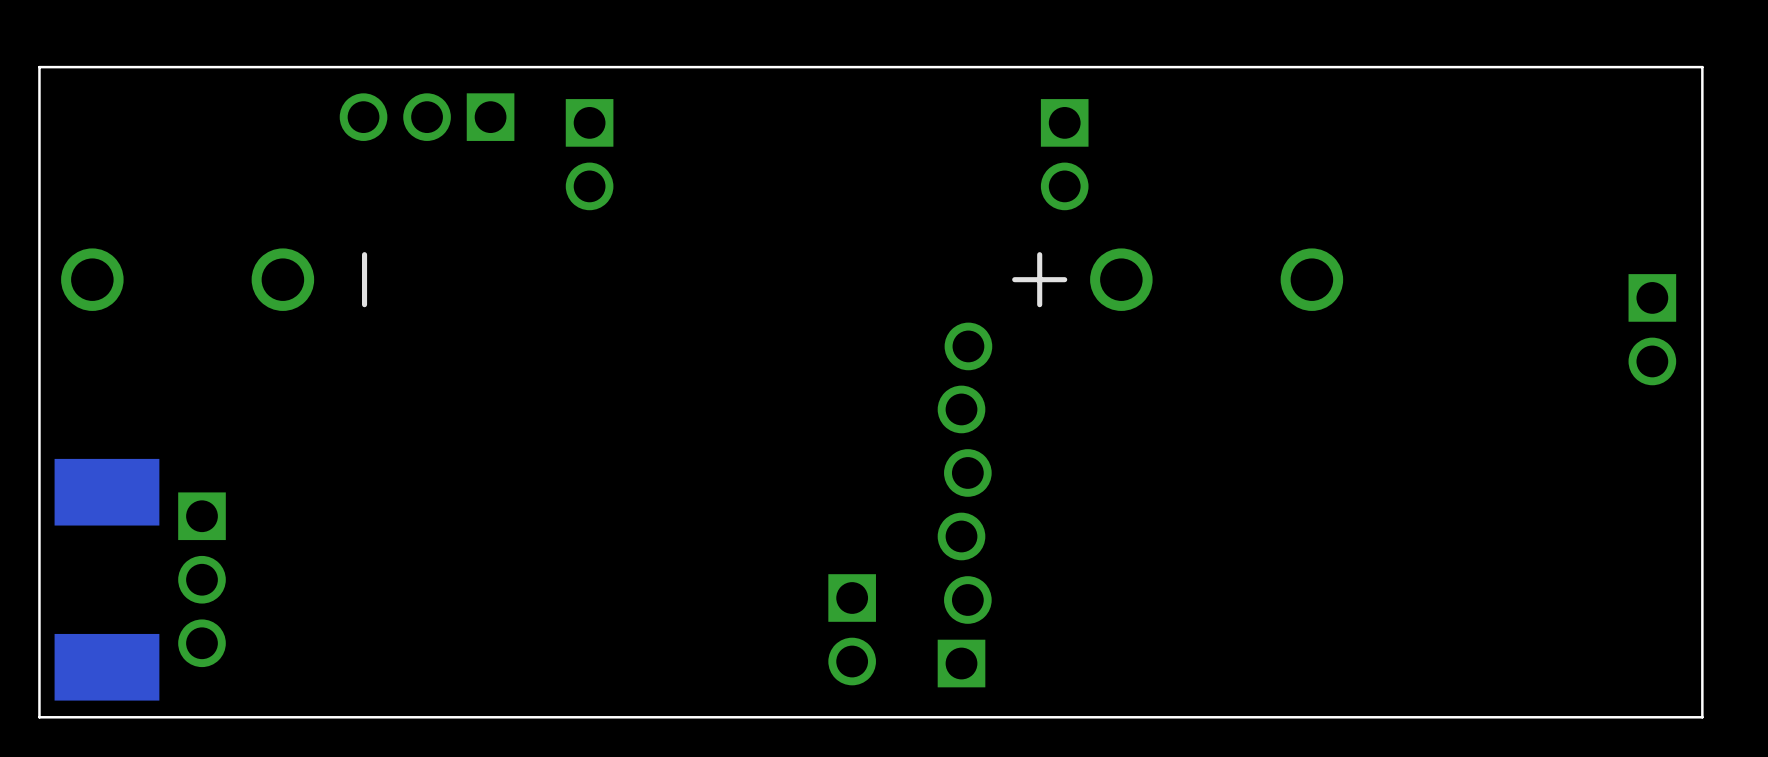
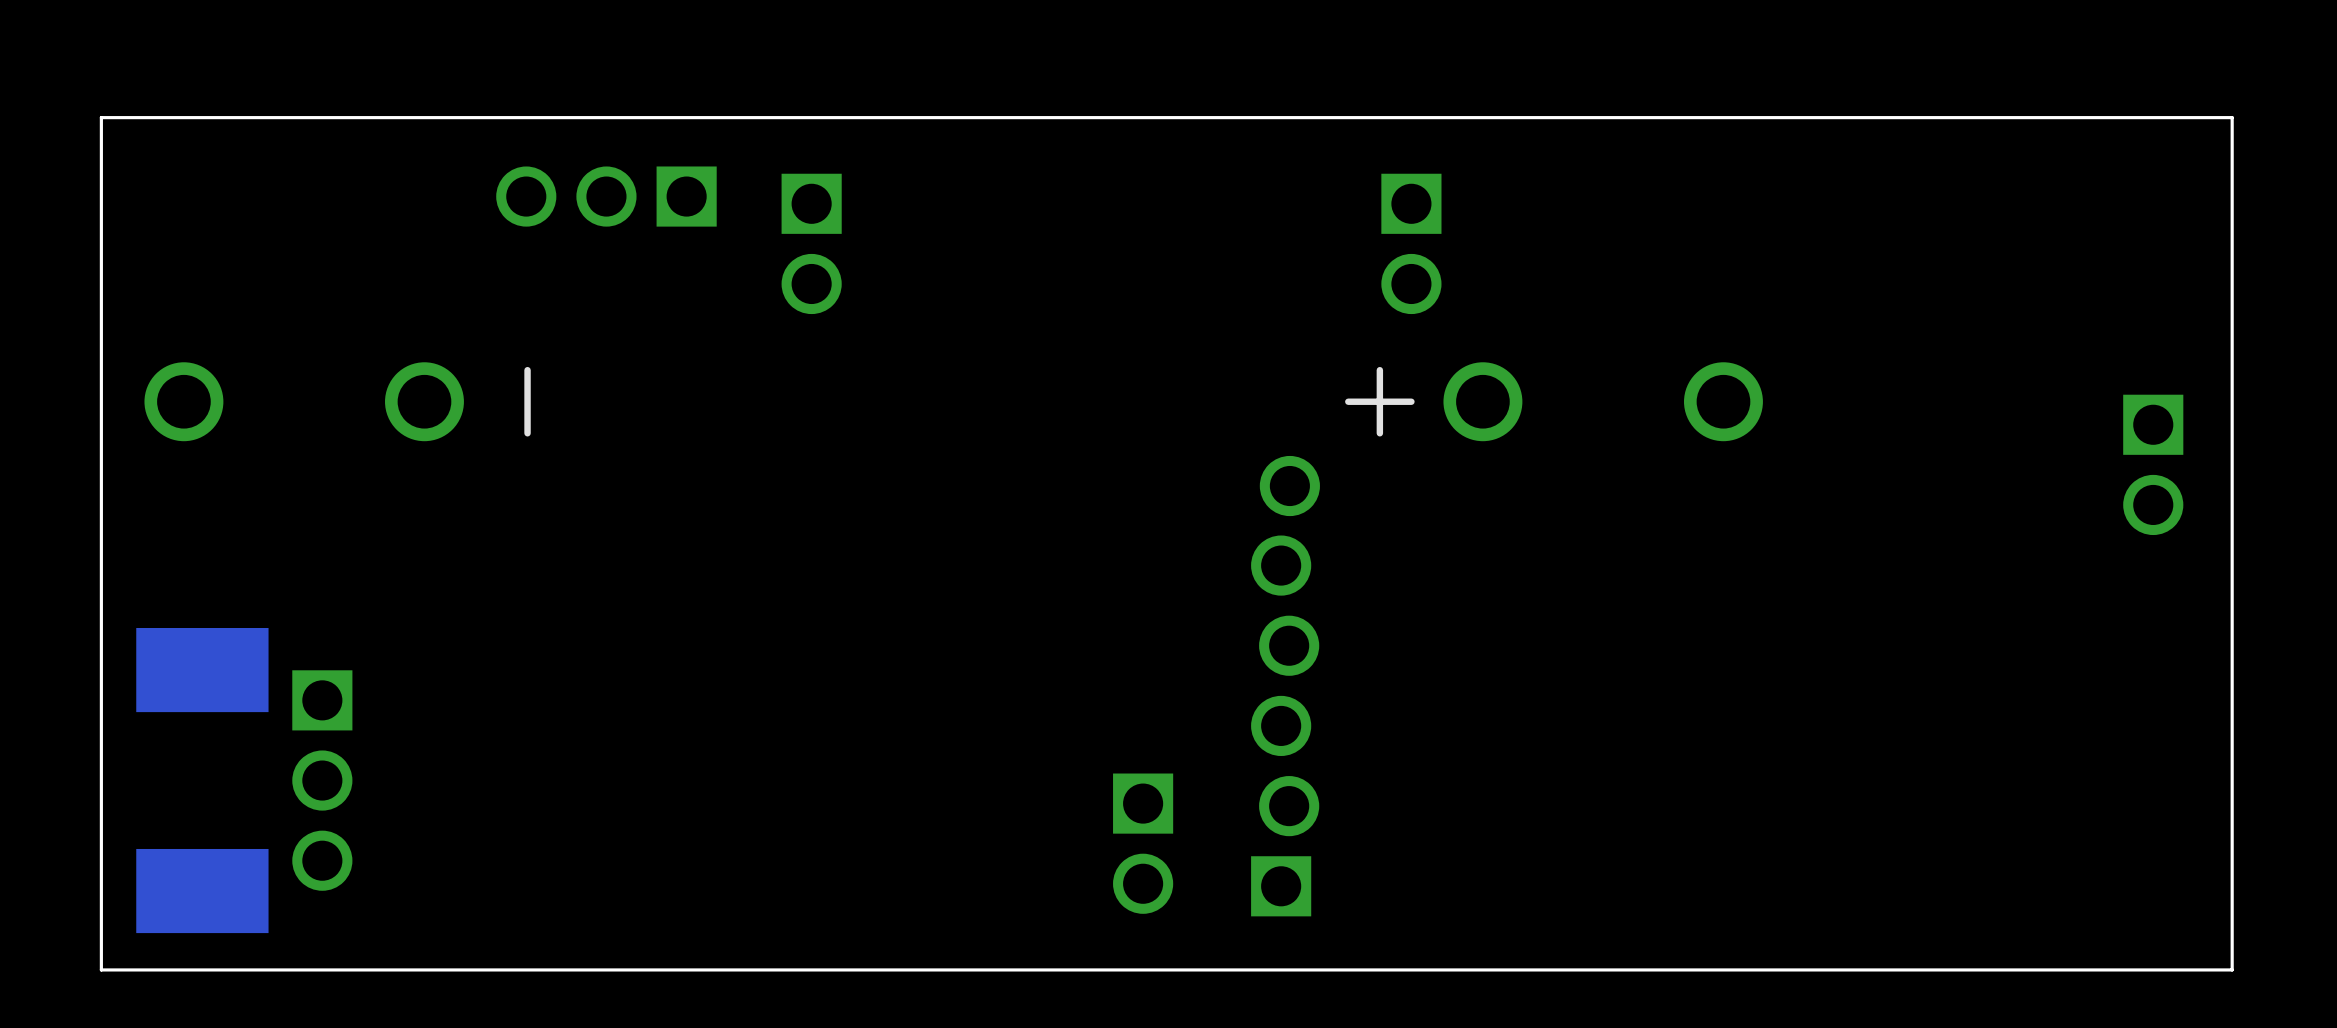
board edge: (1702, 67) (1702, 717) (39, 717) (39, 67) (1702, 67) -> (2232, 117) (2232, 969) (101, 969) (101, 117) (2232, 117)

